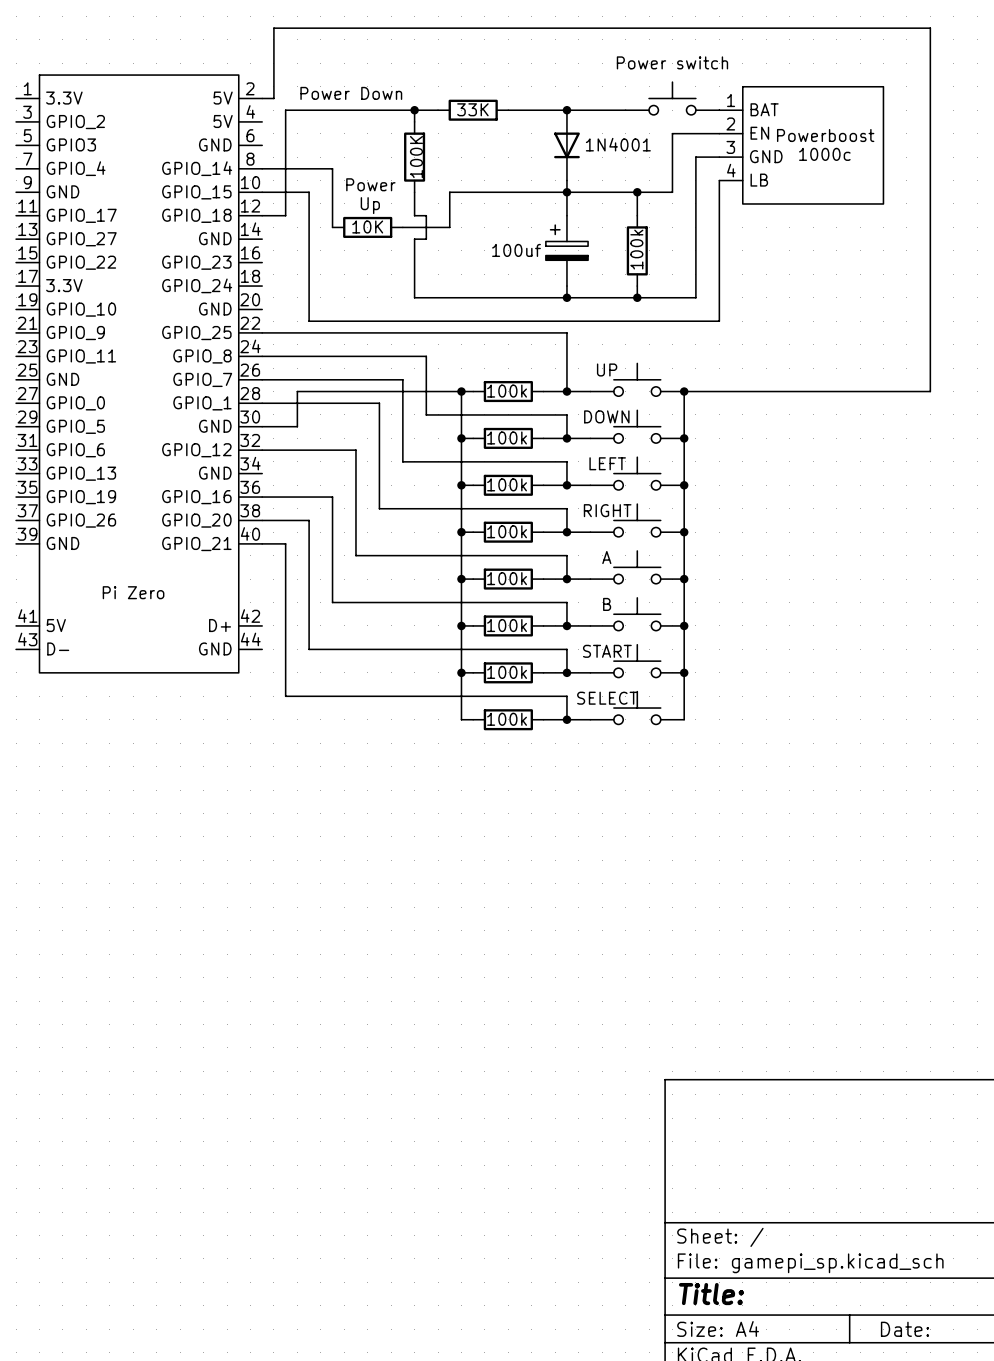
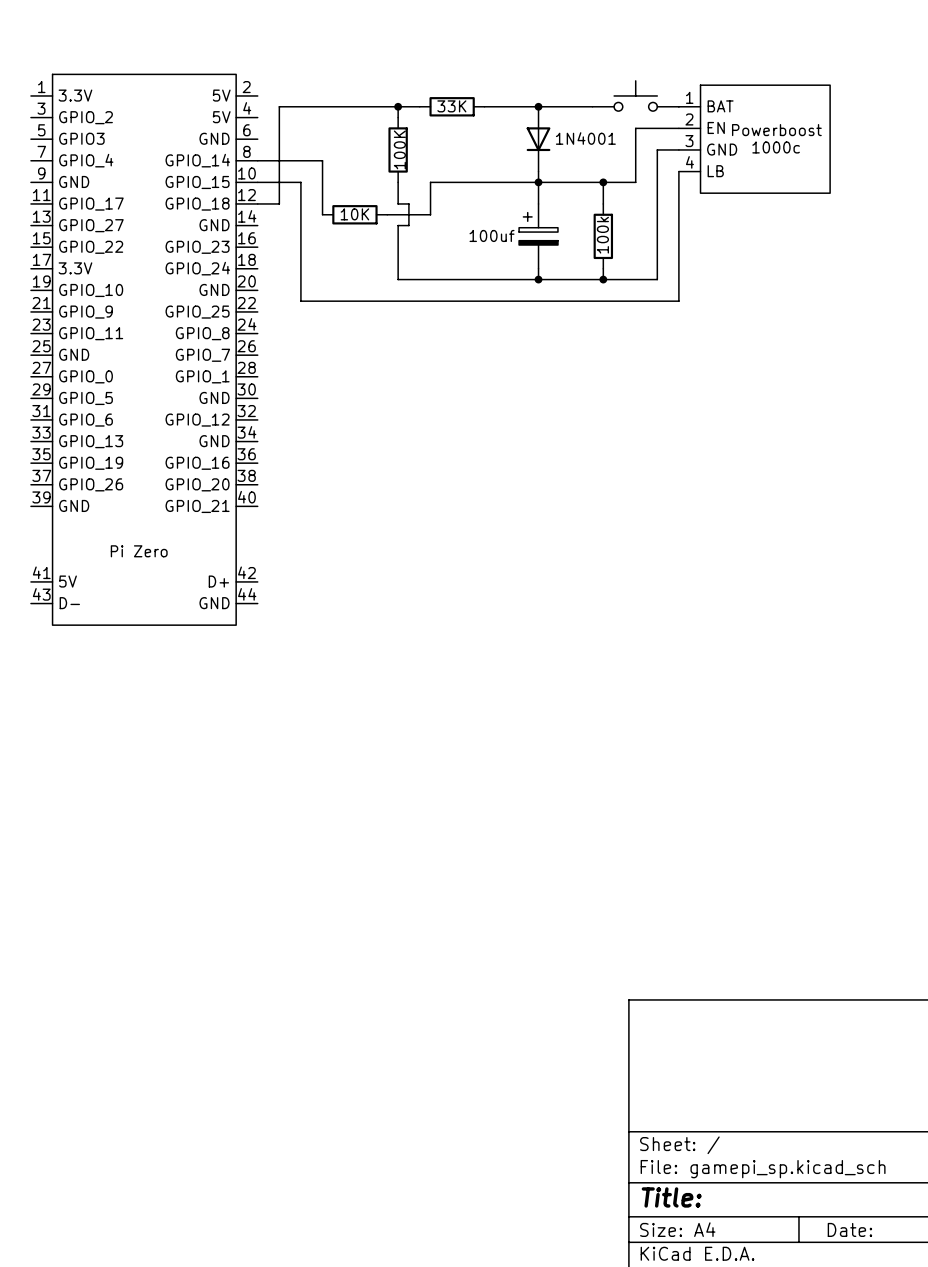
part value: Power switch (672, 62) -> none
text: Power Down (351, 93) -> none
wire: (262, 98) (273, 98) (273, 28) (930, 28) (930, 391) (684, 391) (684, 719) -> none
text: Power (370, 184) -> none
text: Up (370, 205) -> none
wire: (262, 332) (566, 332) (566, 391) -> none
wire: (262, 356) (426, 356) (426, 414) (566, 414) (566, 438) -> none
wire: (262, 379) (402, 379) (402, 461) (566, 461) (566, 485) -> none
part: UP (637, 379) -> none
wire: (461, 391) (461, 719) (473, 719) -> none
junction: (461, 391) -> none
wire: (473, 391) (297, 391) (297, 426) (262, 426) -> none
part: 100k (508, 391) -> none
wire: (543, 391) (590, 391) -> none
junction: (566, 391) -> none
junction: (684, 391) -> none
wire: (262, 403) (379, 403) (379, 508) (566, 508) (566, 532) -> none
part: DOWN (637, 426) -> none
wire: (461, 438) (473, 438) -> none
junction: (461, 438) -> none
part: 100k (508, 438) -> none
wire: (543, 438) (590, 438) -> none
junction: (566, 438) -> none
junction: (684, 438) -> none
wire: (262, 450) (355, 450) (355, 555) (566, 555) (566, 579) -> none
part: LEFT (637, 473) -> none
wire: (461, 485) (473, 485) -> none
junction: (461, 485) -> none
part: 100k (508, 485) -> none
wire: (543, 485) (590, 485) -> none
junction: (566, 485) -> none
junction: (684, 485) -> none
wire: (262, 497) (332, 497) (332, 602) (566, 602) (566, 625) -> none
wire: (262, 520) (309, 520) (309, 649) (566, 649) (566, 672) -> none
part: RIGHT (637, 520) -> none
wire: (461, 532) (473, 532) -> none
junction: (461, 532) -> none
part: 100k (508, 532) -> none
wire: (543, 532) (590, 532) -> none
junction: (566, 532) -> none
junction: (684, 532) -> none
wire: (262, 543) (285, 543) (285, 696) (566, 696) (566, 719) -> none
part: A (637, 567) -> none
wire: (461, 579) (473, 579) -> none
junction: (461, 579) -> none
part: 100k (508, 579) -> none
wire: (543, 579) (590, 579) -> none
junction: (566, 579) -> none
junction: (684, 579) -> none
part: B (637, 614) -> none
wire: (461, 625) (473, 625) -> none
junction: (461, 625) -> none
part: 100k (508, 625) -> none
wire: (543, 625) (590, 625) -> none
junction: (566, 625) -> none
junction: (684, 625) -> none
part: START (637, 661) -> none
wire: (461, 672) (473, 672) -> none
junction: (461, 672) -> none
part: 100k (508, 672) -> none
wire: (543, 672) (590, 672) -> none
junction: (566, 672) -> none
junction: (684, 672) -> none
part: SELECT (637, 708) -> none
part: 100k (508, 719) -> none
wire: (543, 719) (590, 719) -> none
junction: (566, 719) -> none

